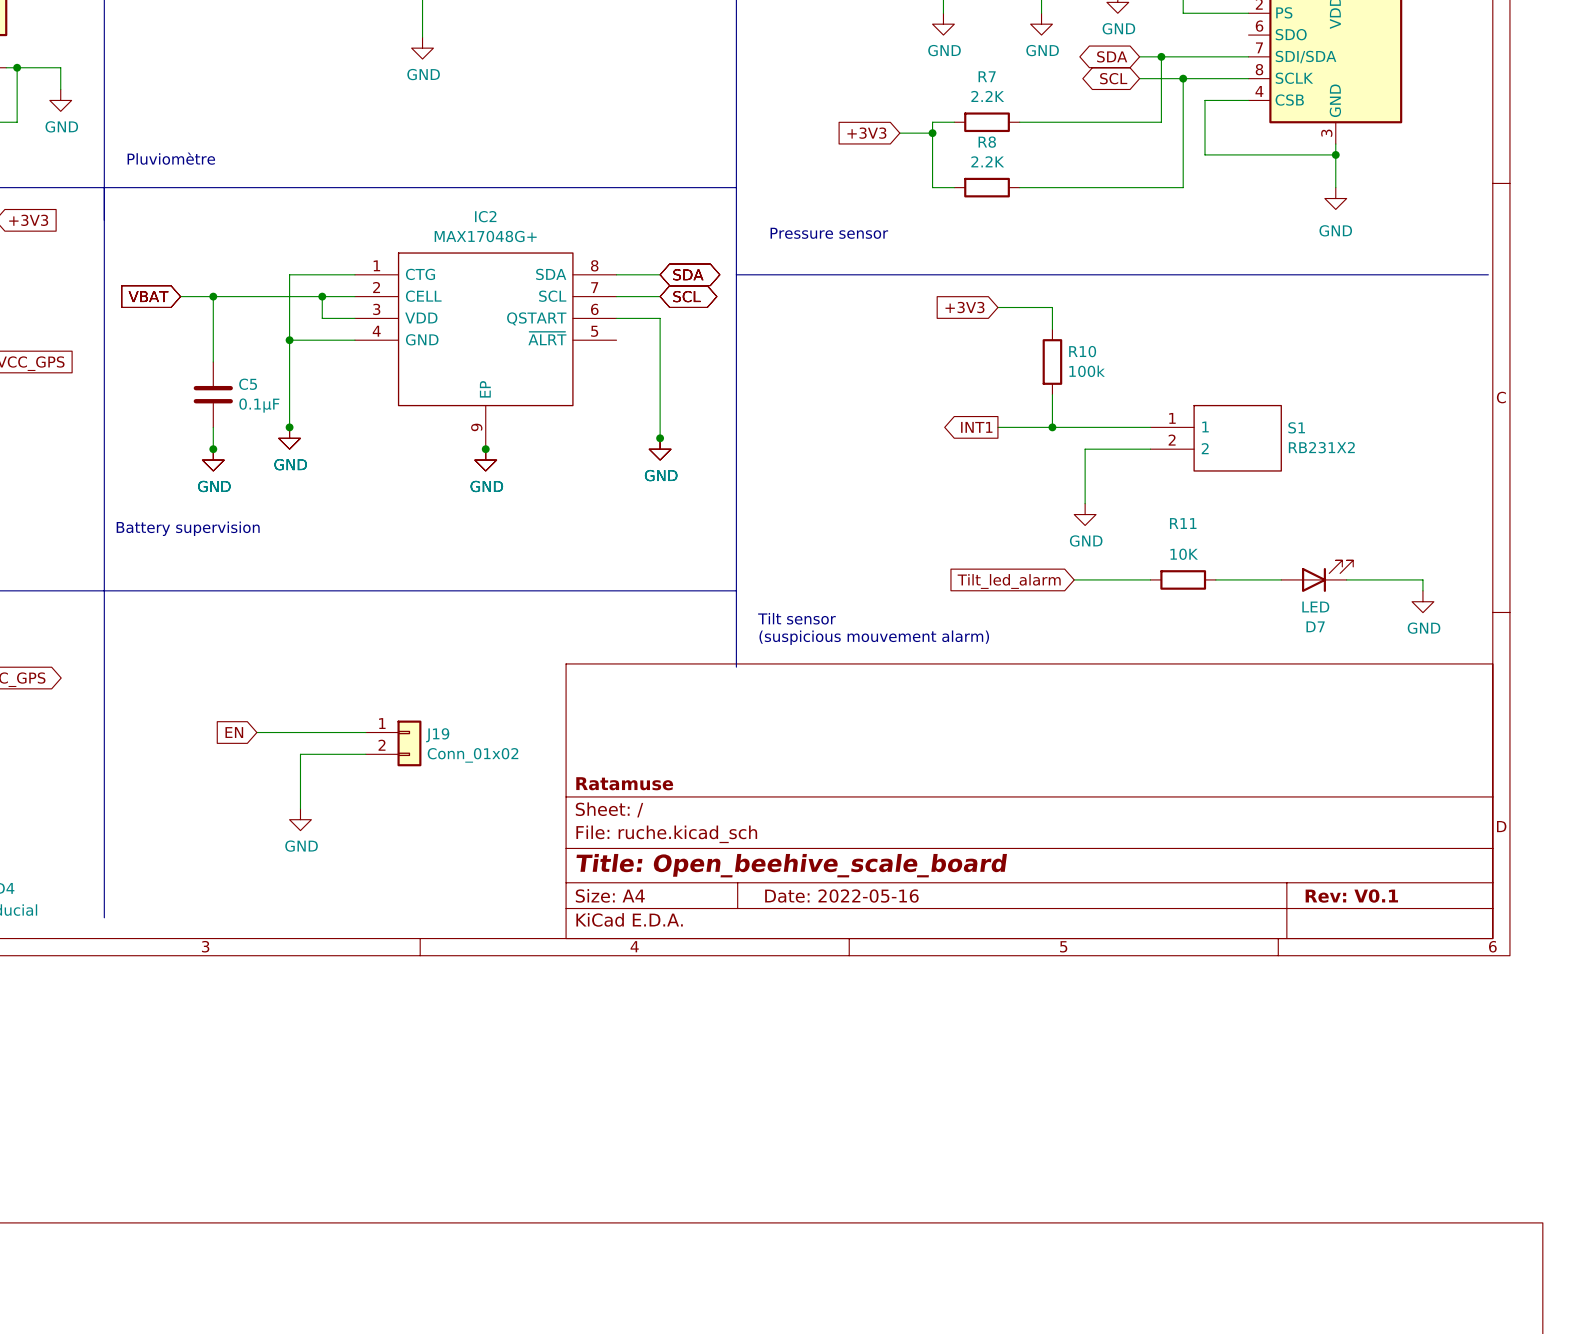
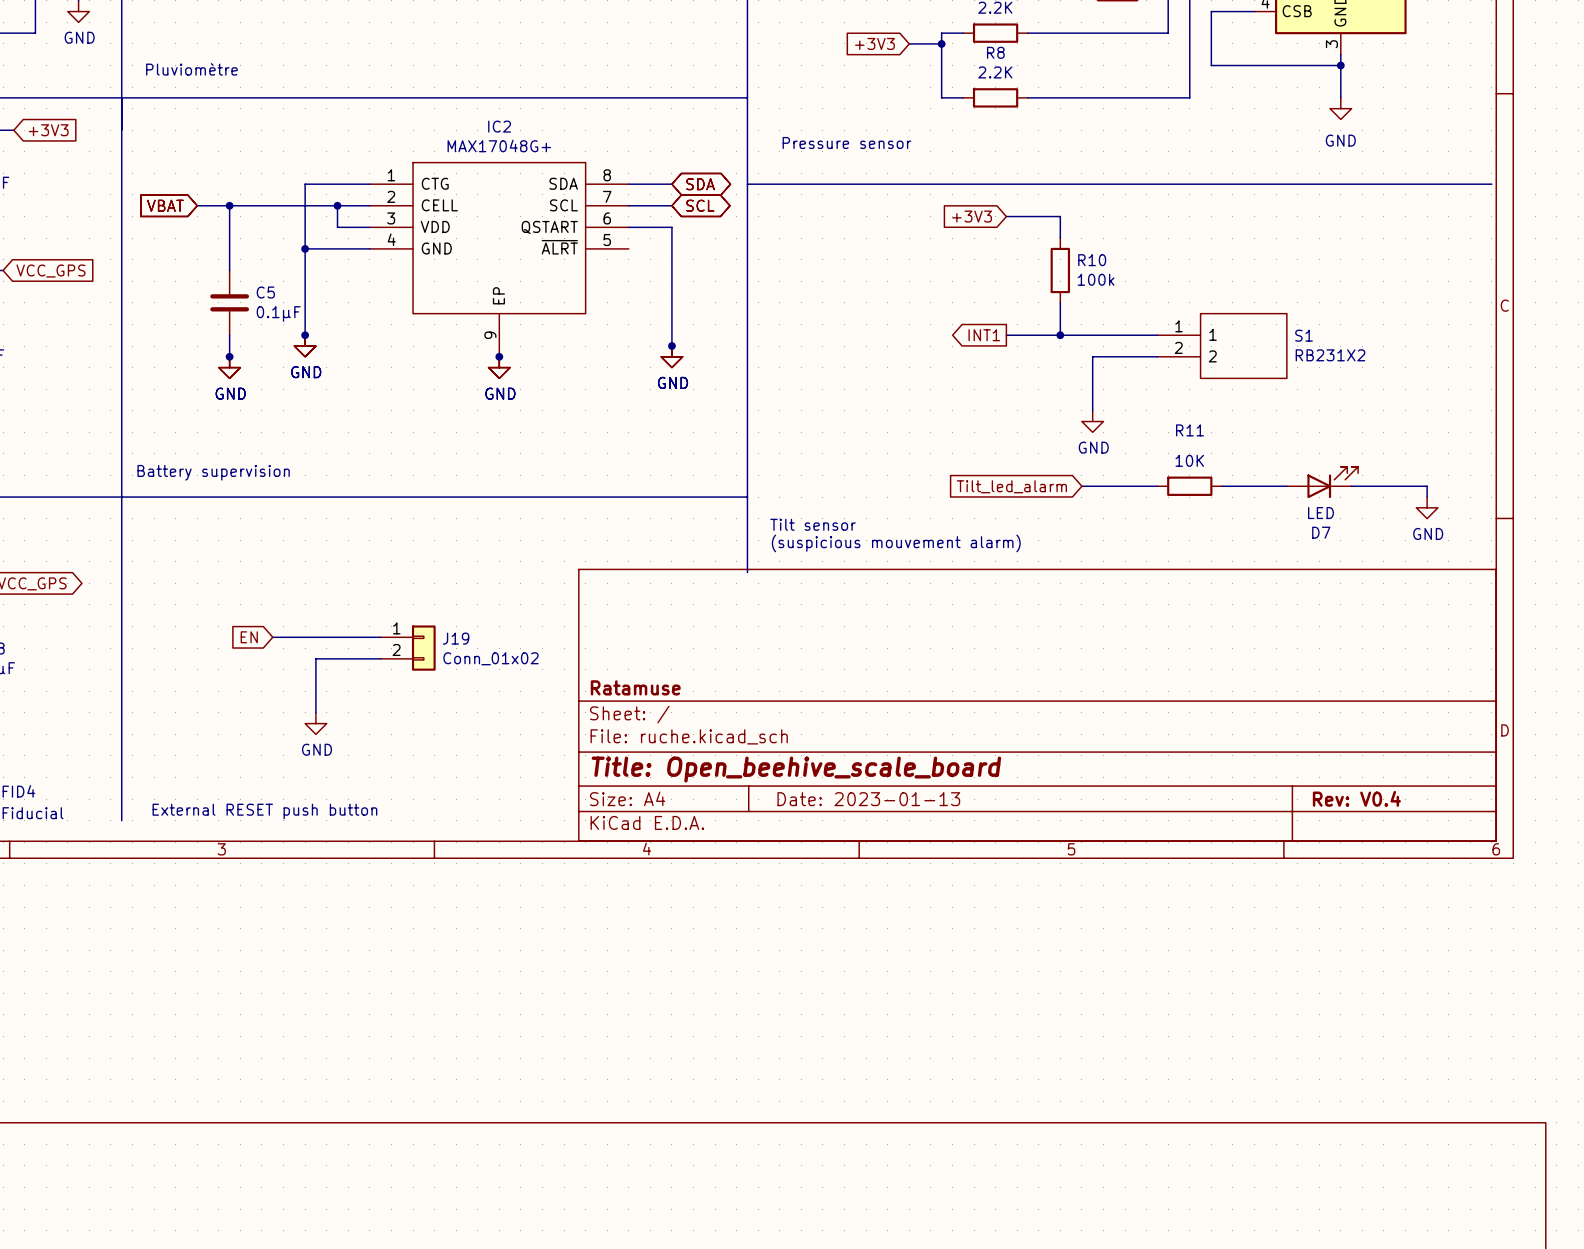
text position: Battery supervision (188, 528) -> Battery supervision (213, 472)
title block: Date: 2022-05-16 (841, 896) -> Date: 2023-01-13 (868, 799)
title block: Rev: V0.1 (1351, 896) -> Rev: V0.4 (1356, 798)
text: none -> External RESET push button (264, 811)

